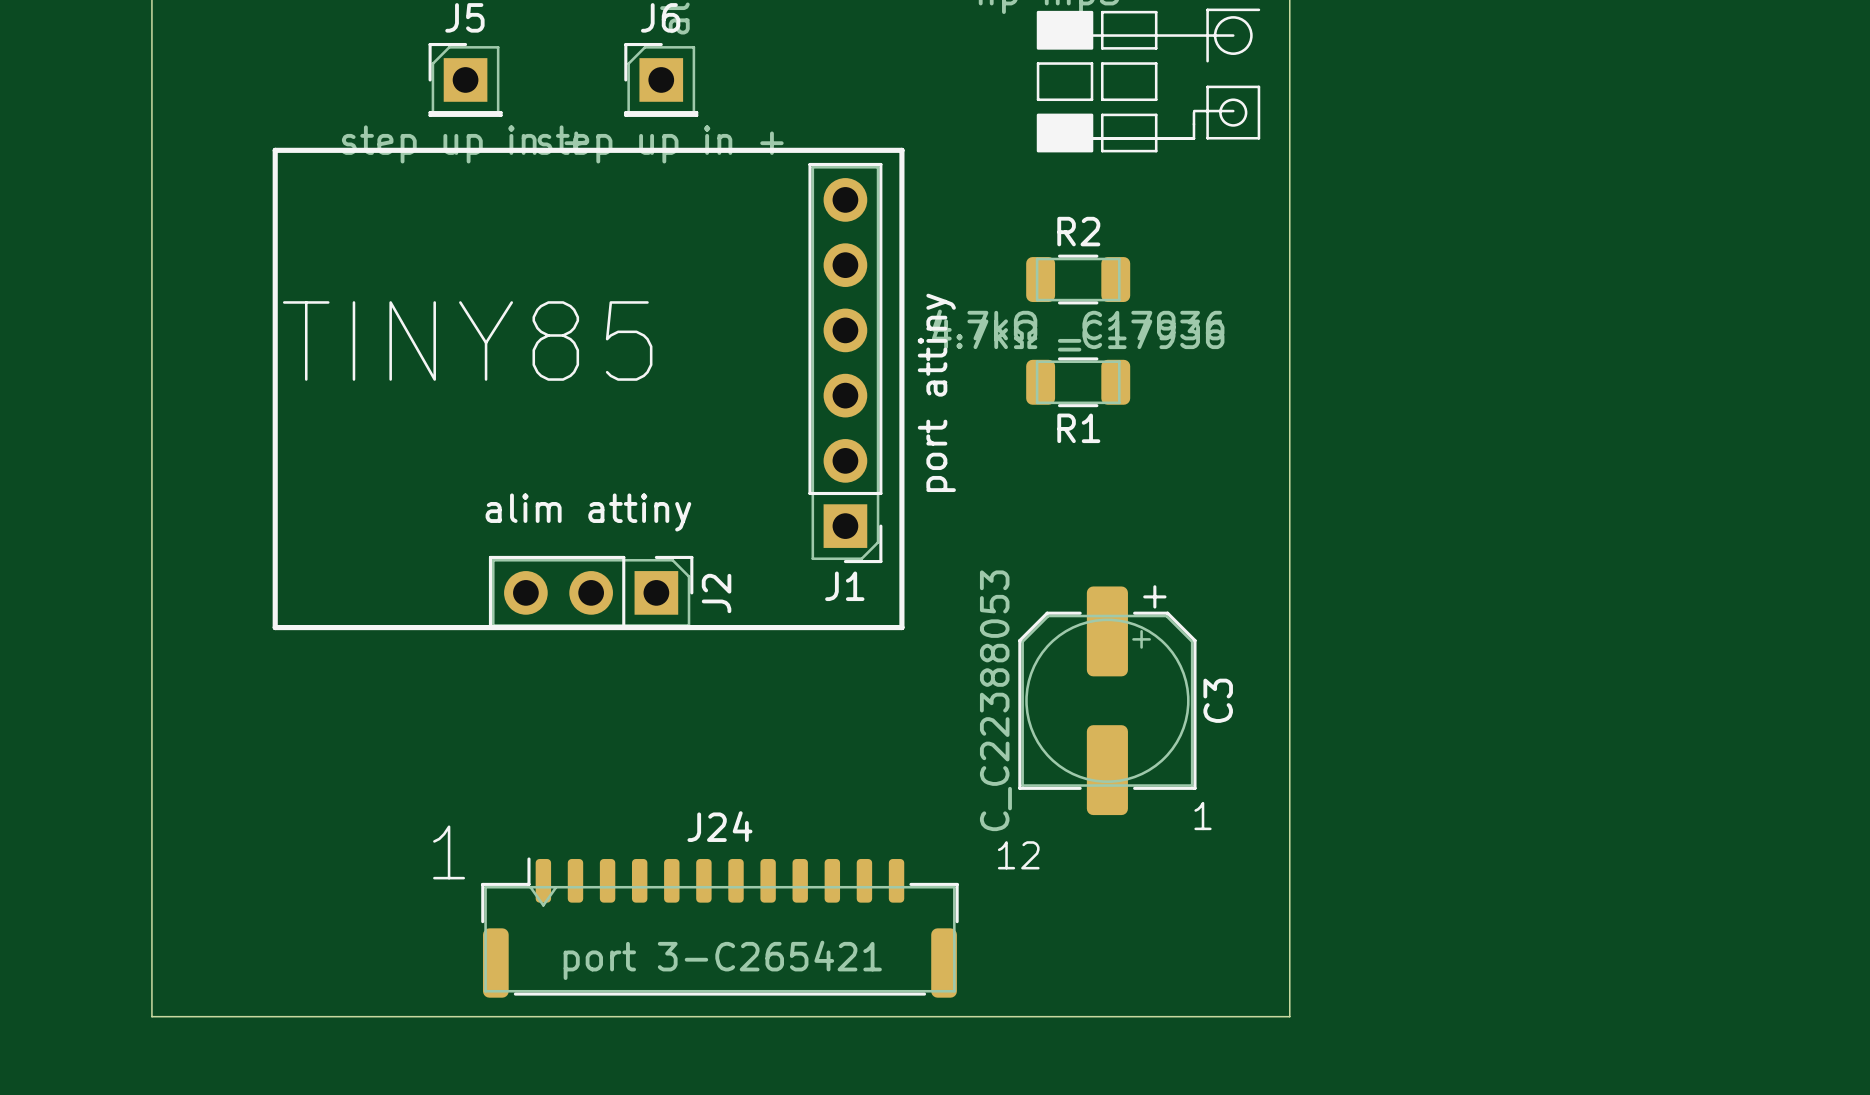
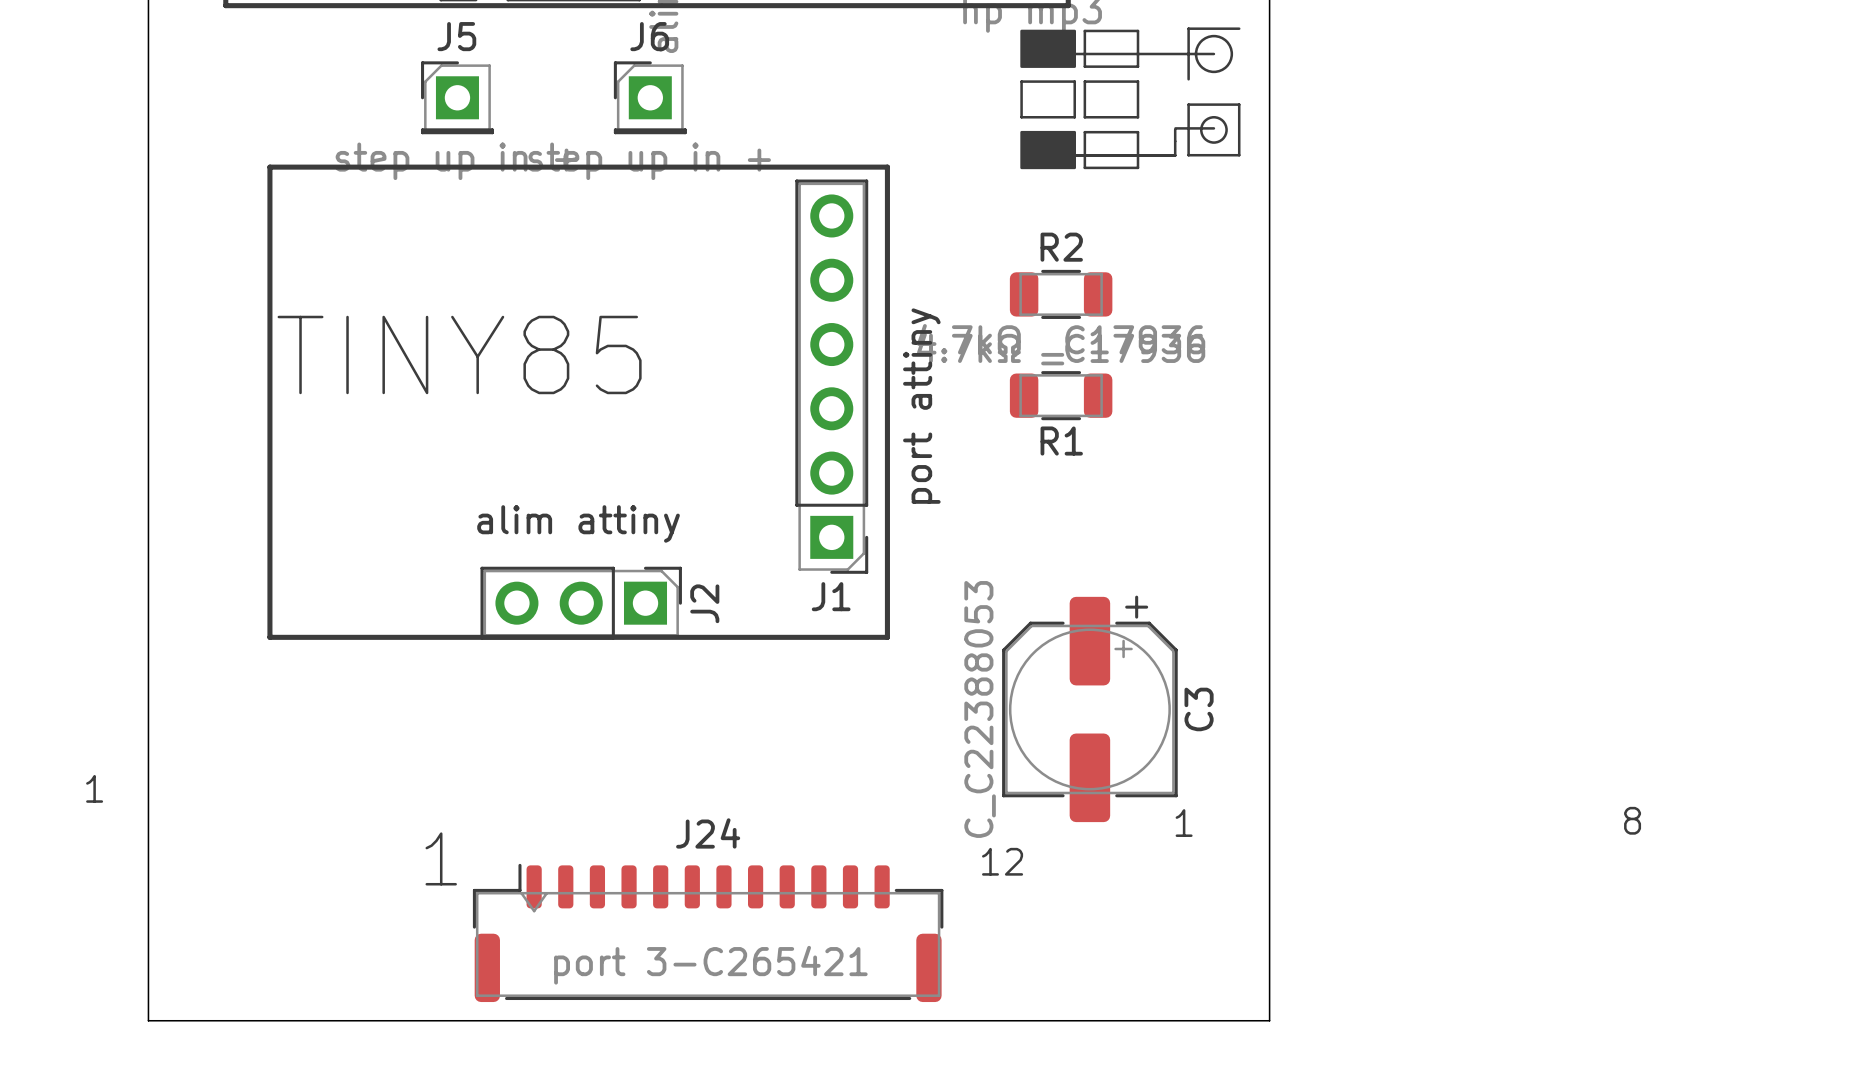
text: none -> 1 (94, 788)
text: none -> 8 (1632, 820)

